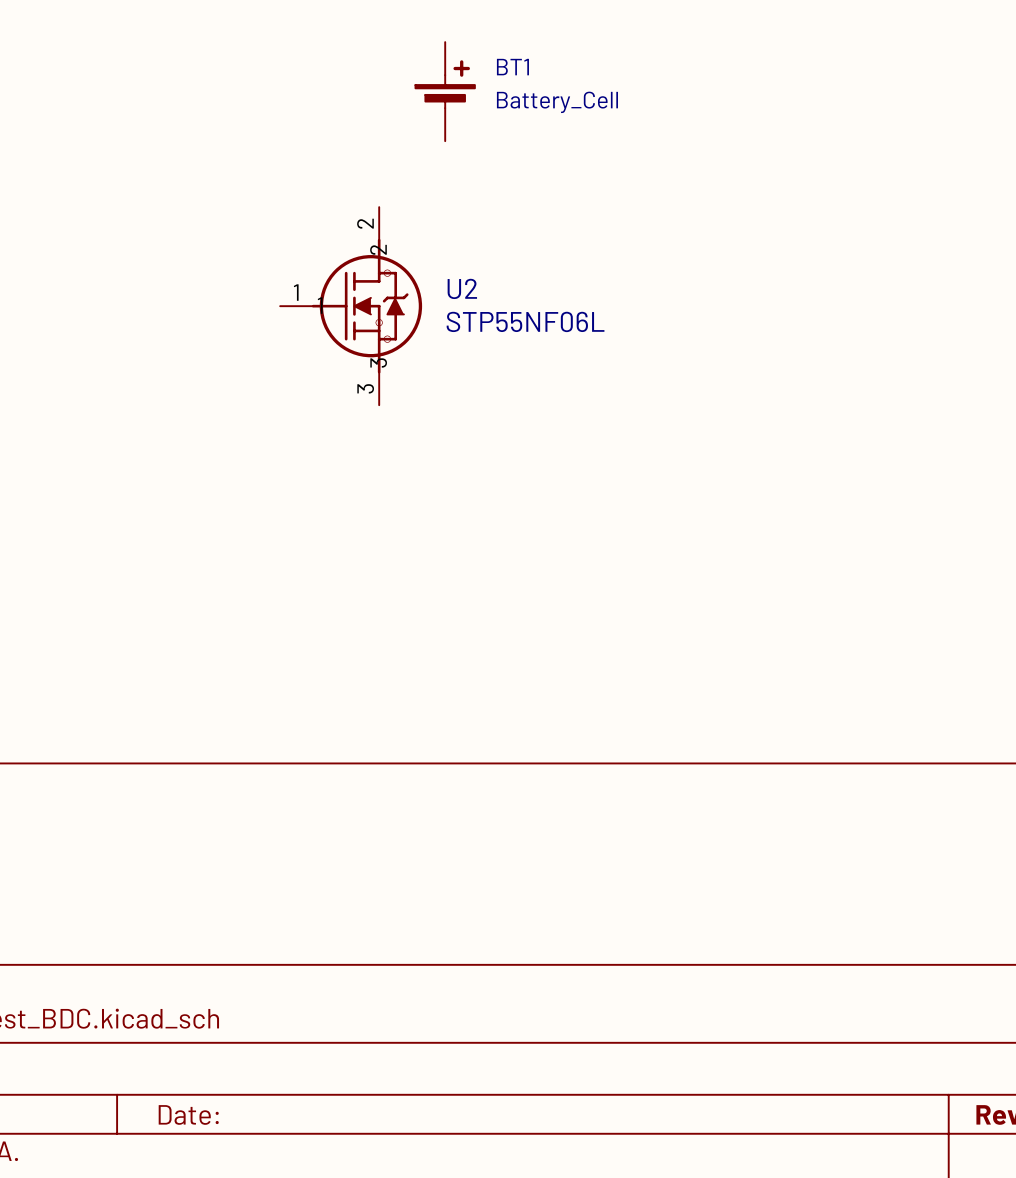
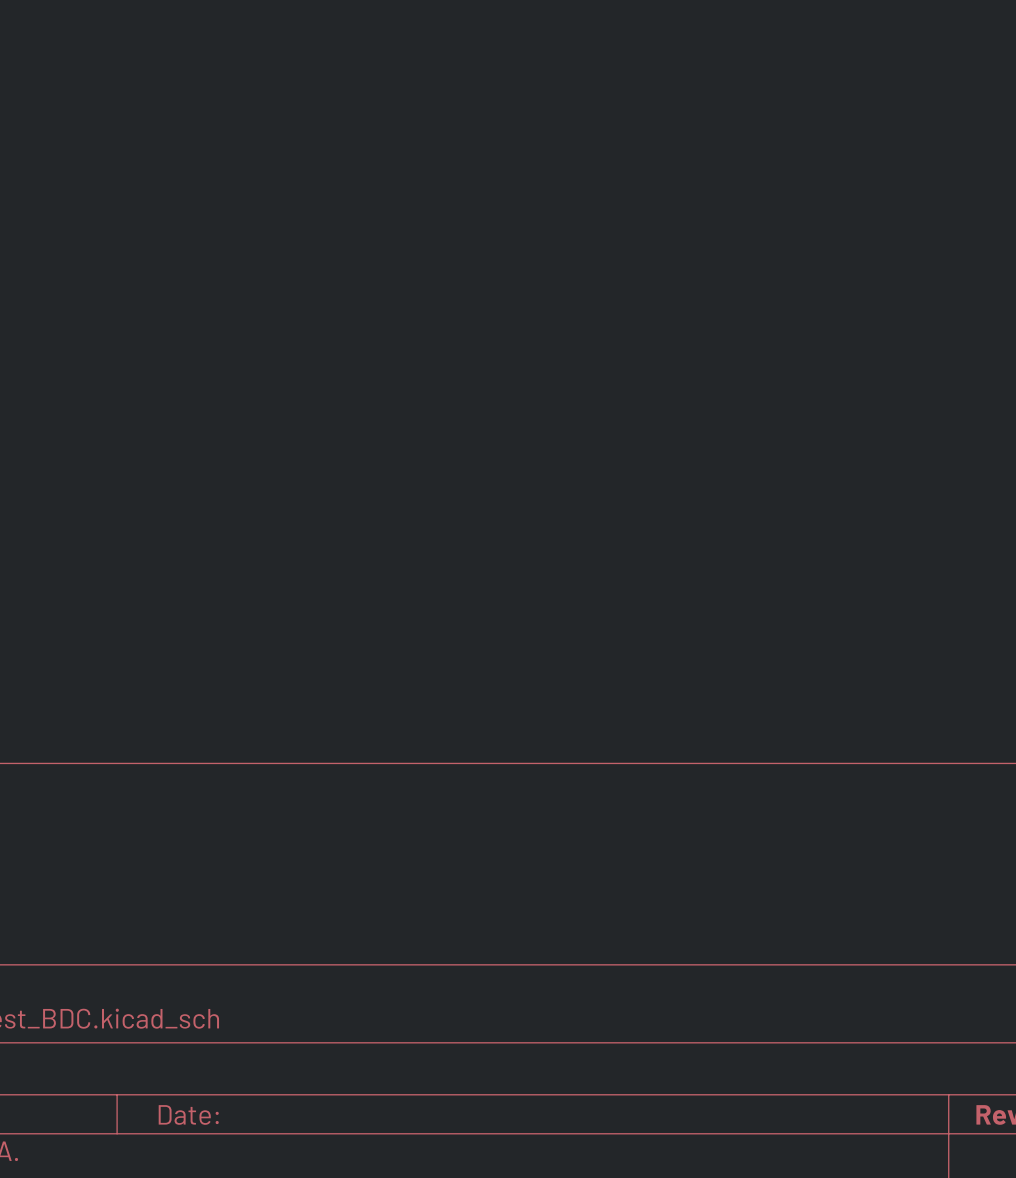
BT1: Battery_Cell (445, 91) -> none
U2: STP55NF06L (351, 306) -> none

